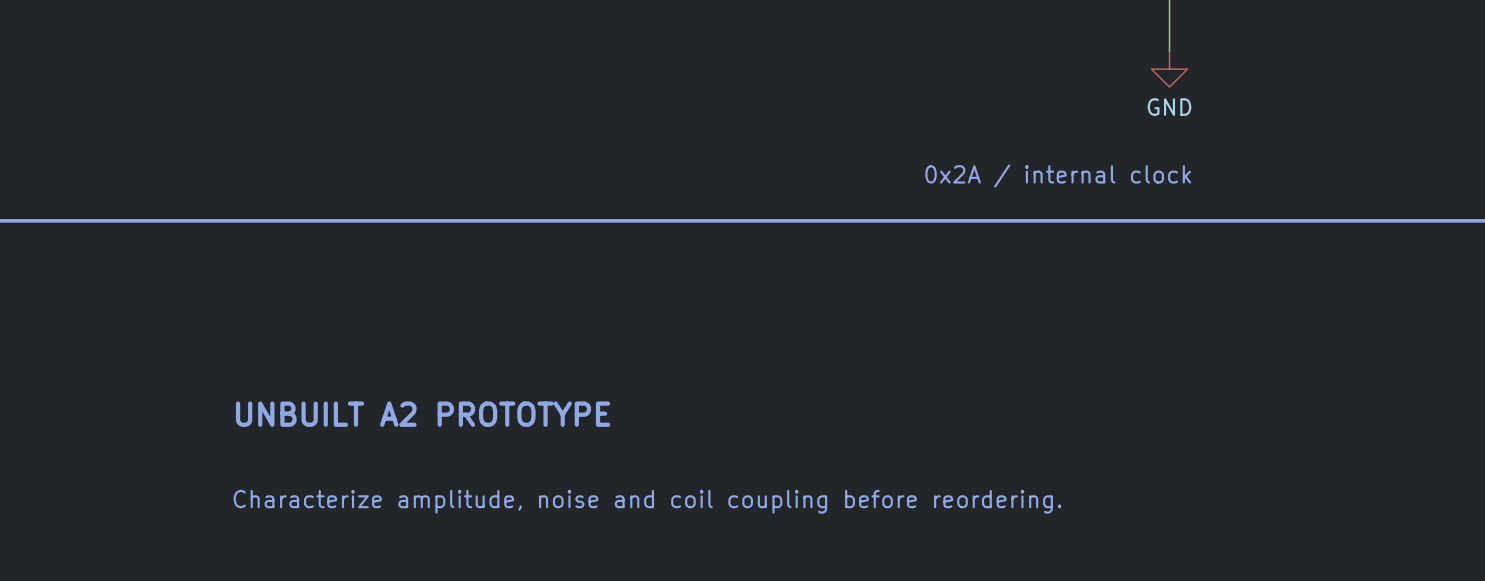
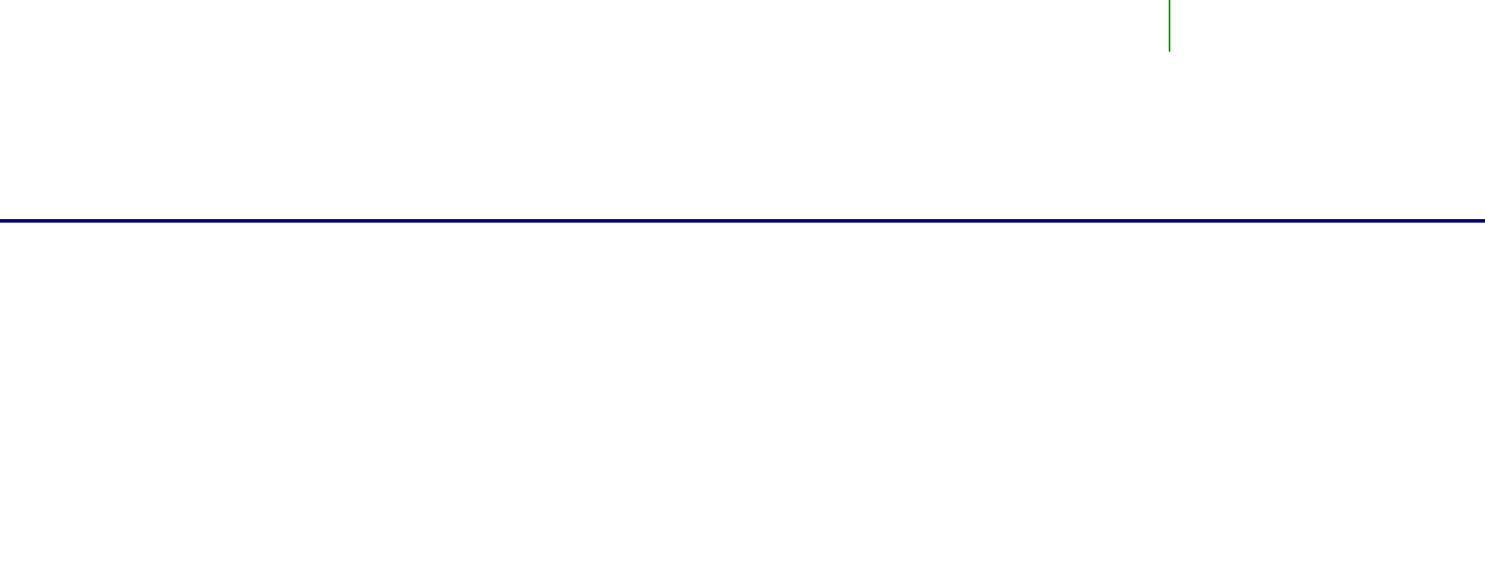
power symbol: GND (1169, 69) -> none
text: 0x2A / internal clock (1058, 175) -> none
text: UNBUILT A2 PROTOTYPE (423, 414) -> none
text: Characterize amplitude, noise and coil coupling before reordering. (647, 501) -> none

